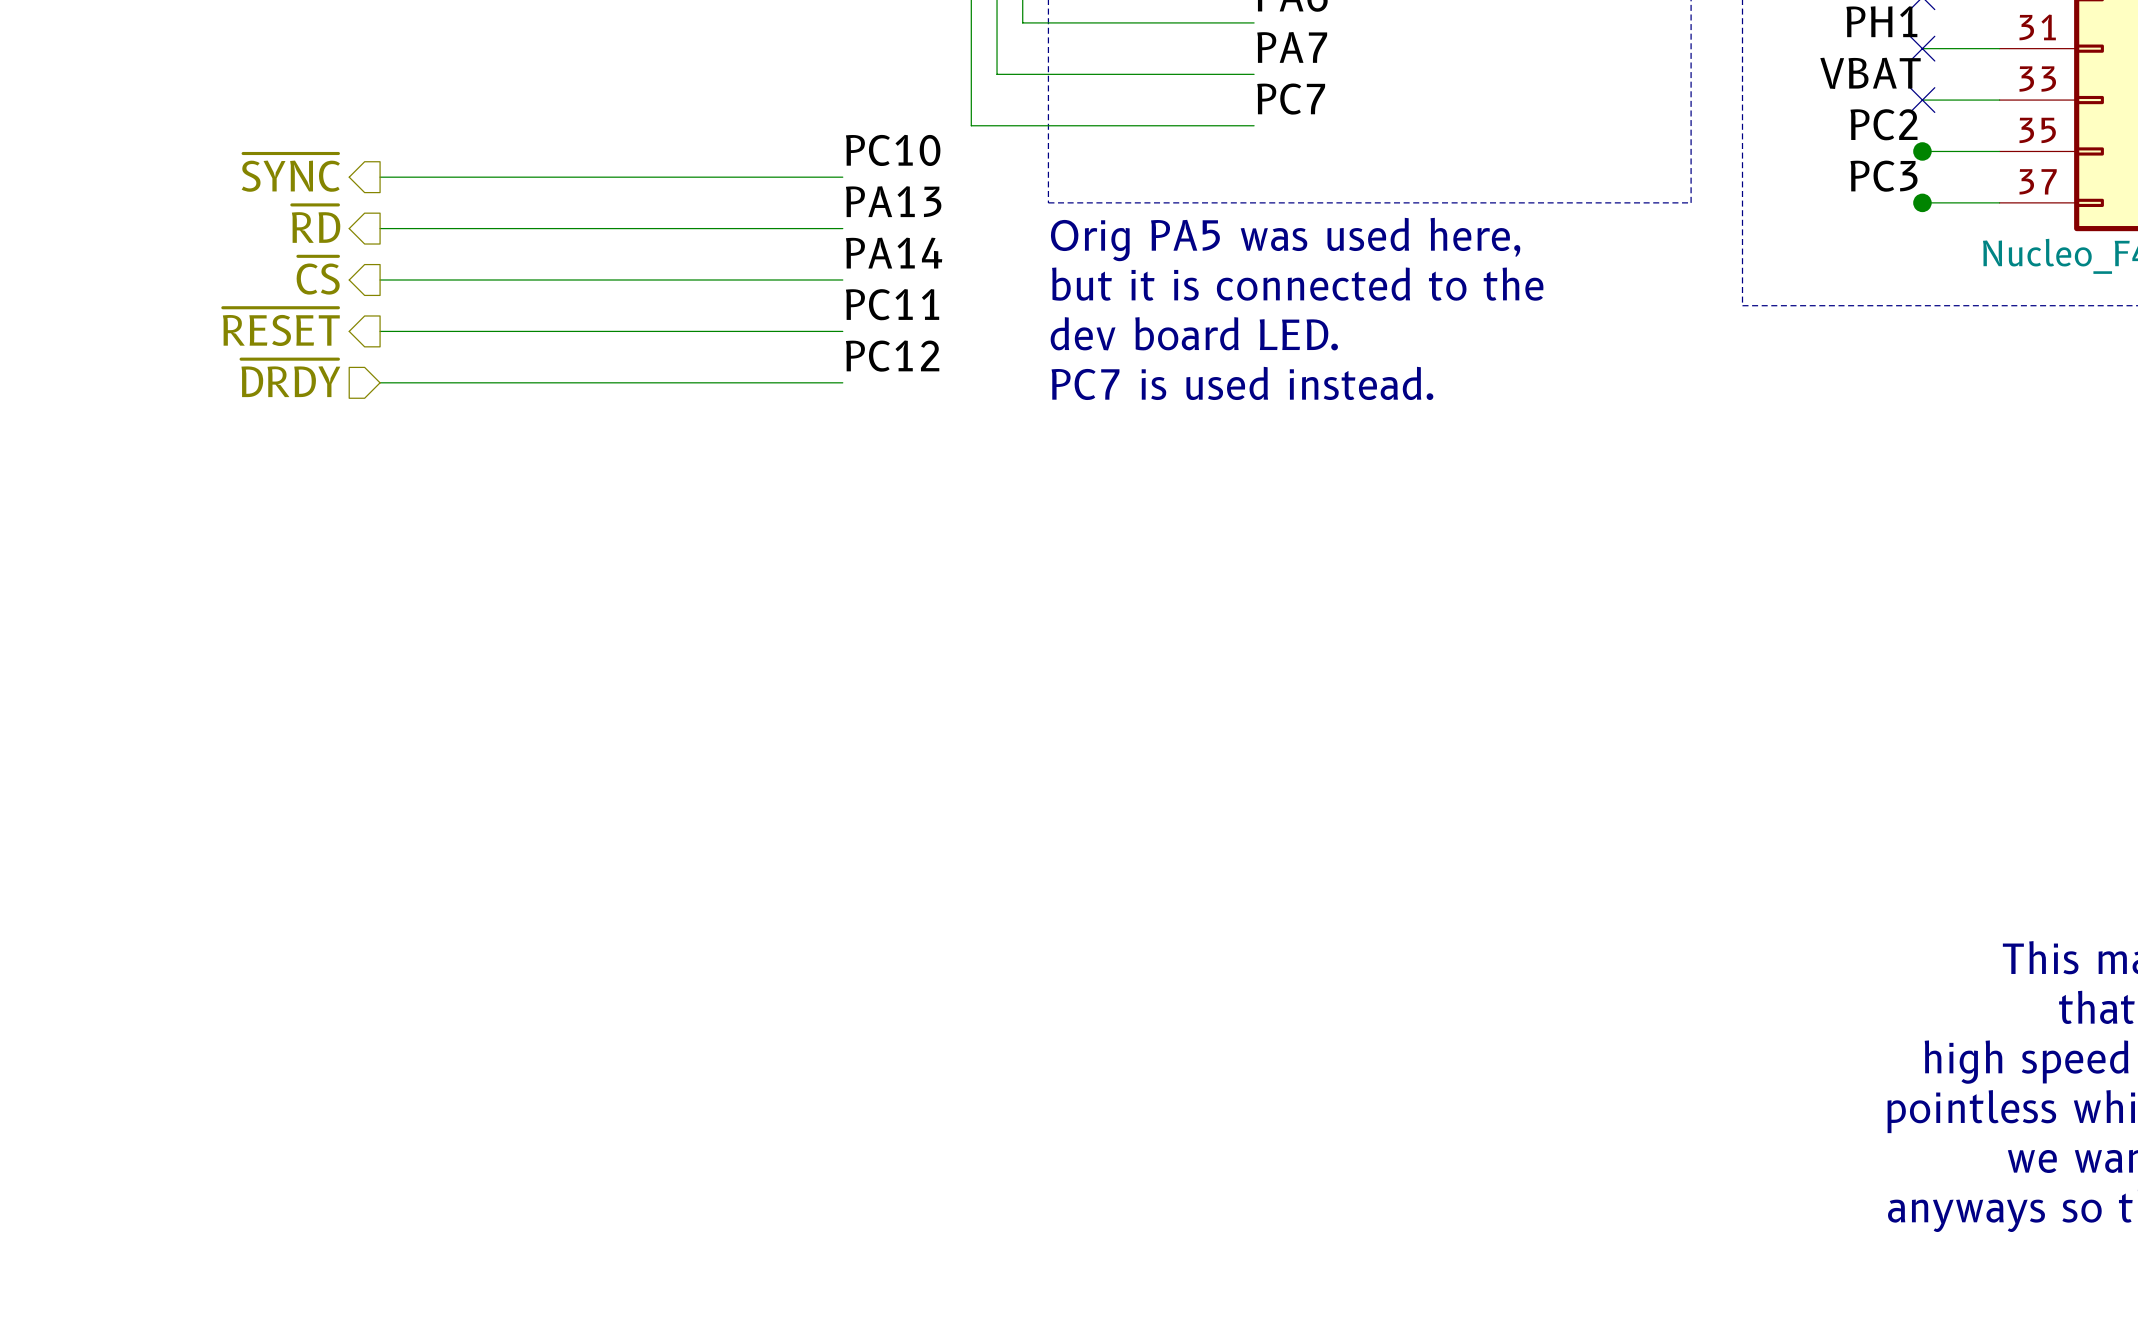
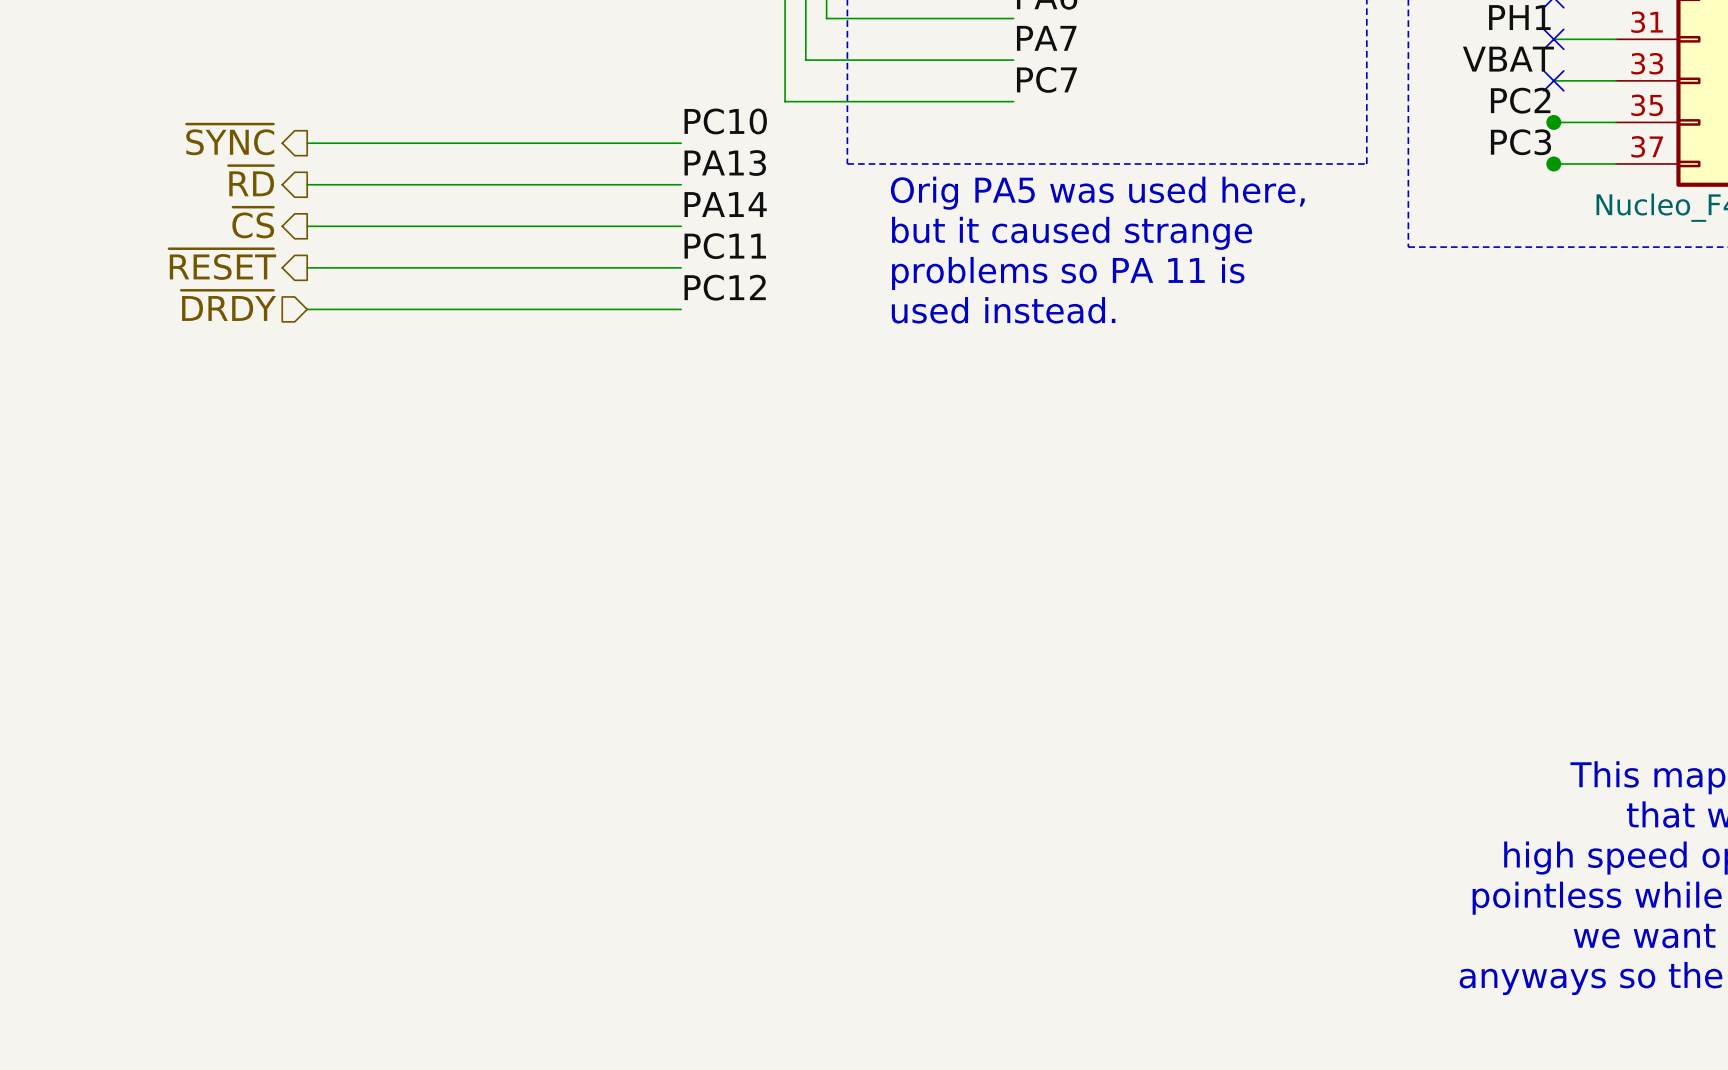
text position: Orig PA5 was used here, (1285, 239) -> Orig PA5 was used here, (1097, 193)
text: but it is connected to the (1297, 284) -> none
text: none -> but it caused strange (1072, 233)
text: dev board LED. (1194, 333) -> none
text: none -> problems so PA 11 is (1068, 273)
text: PC7 is used instead. (1242, 383) -> used instead. (1003, 310)

